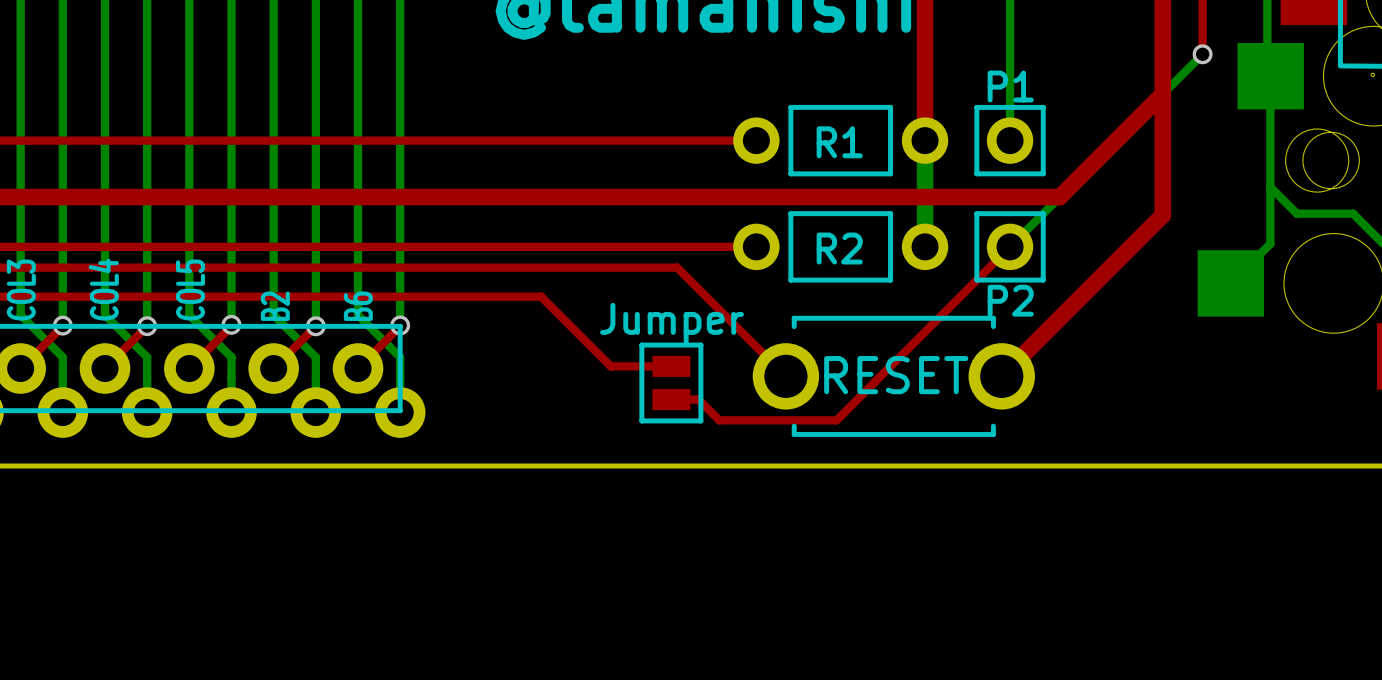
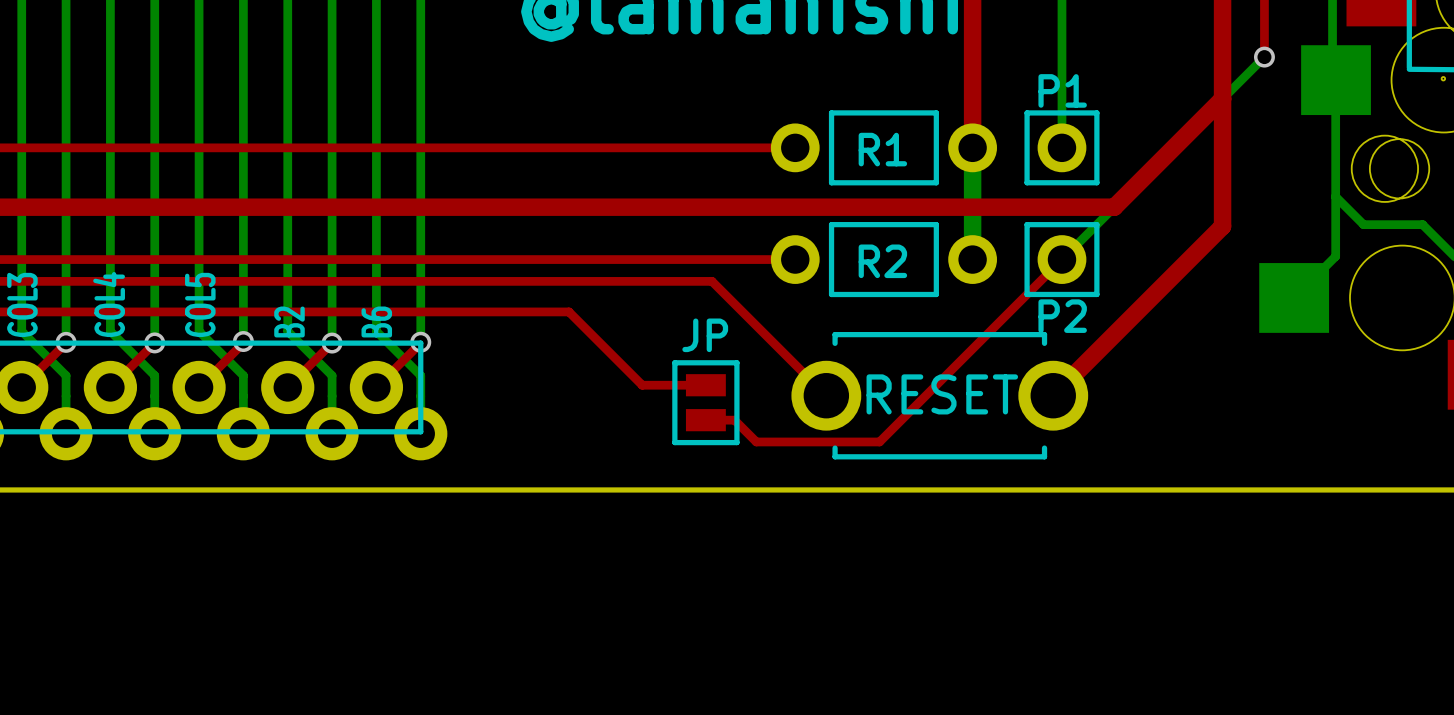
part value: Jumper (672, 323) -> JP (705, 335)

